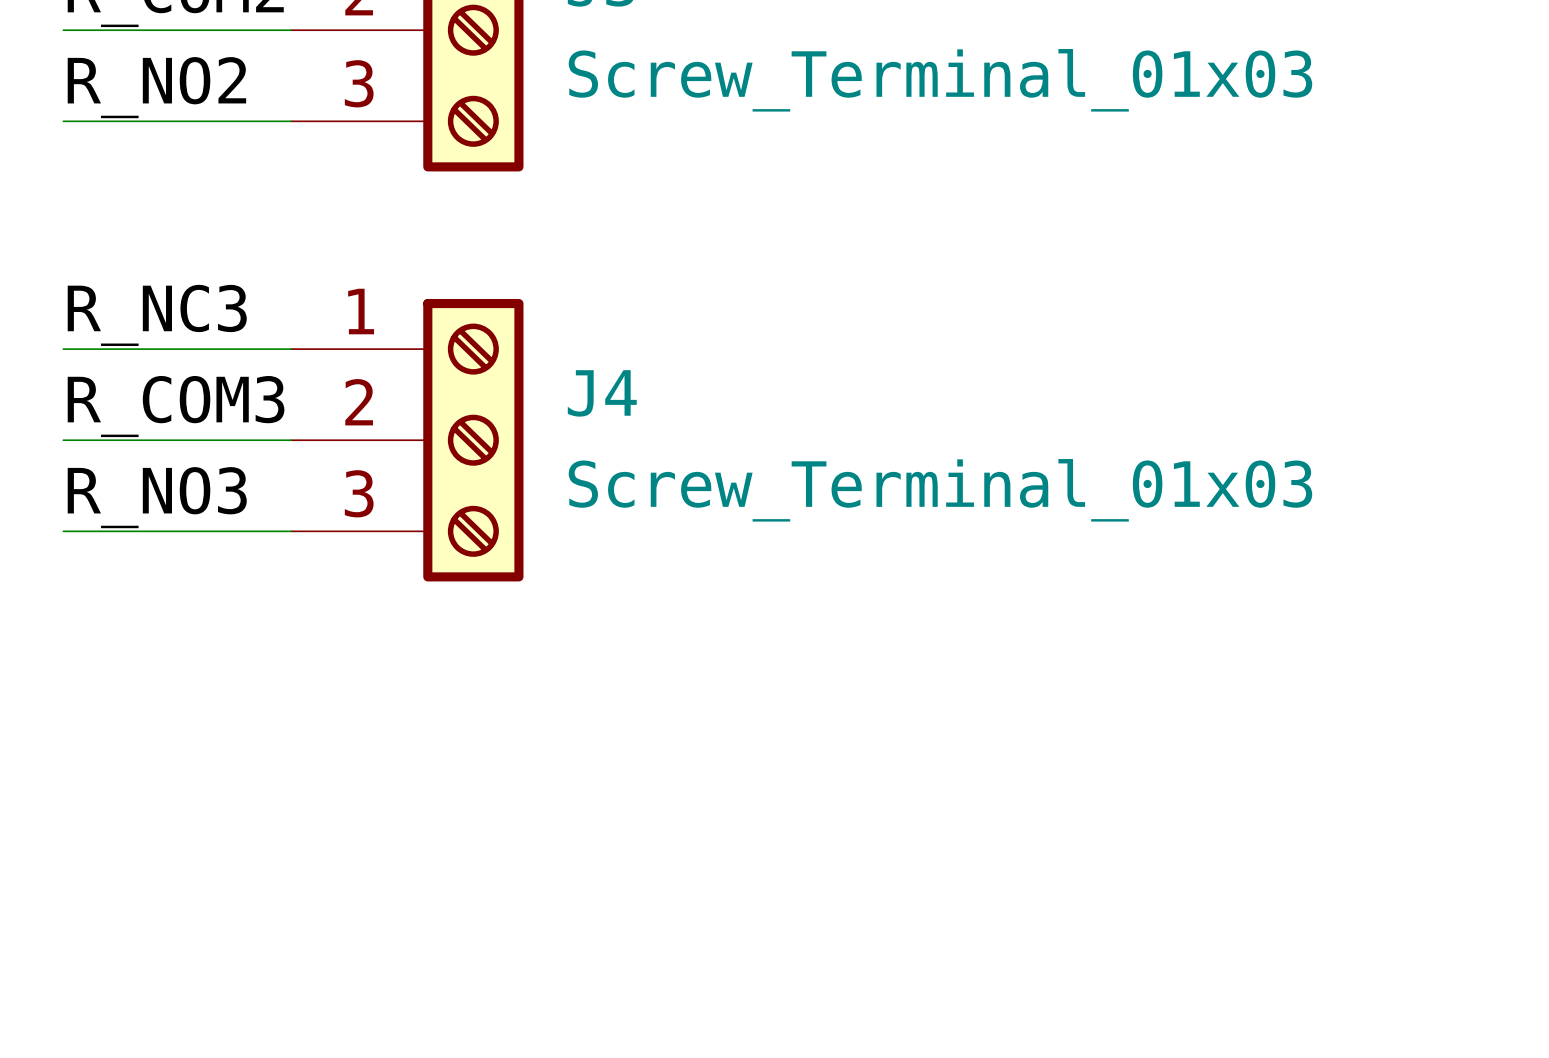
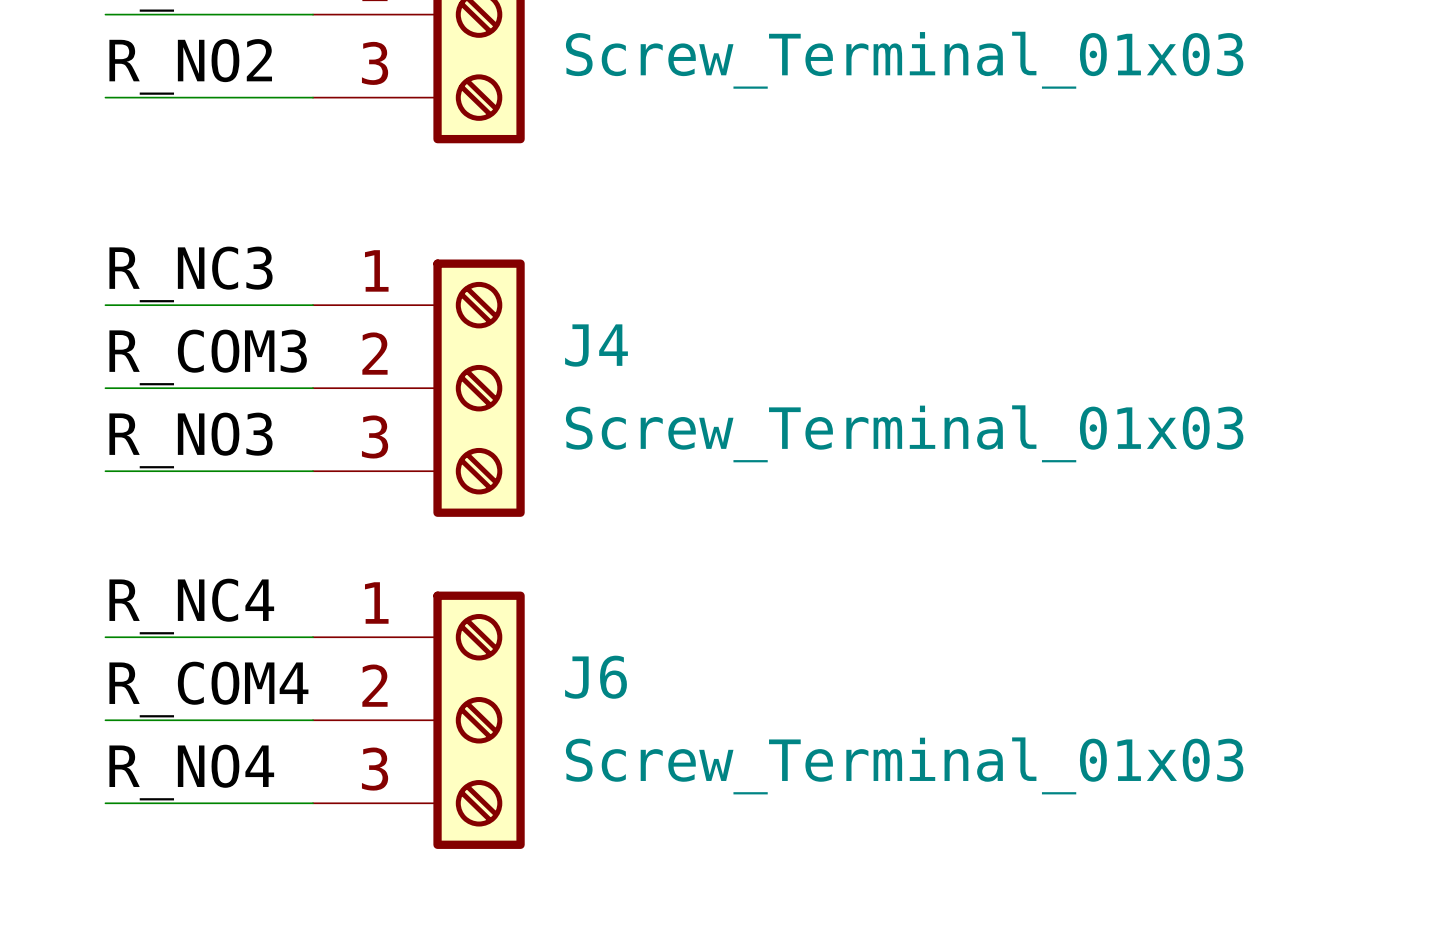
label: none -> R_NC4 (191, 606)
wire: none -> (105, 637) (313, 637)
label: none -> R_COM4 (208, 689)
wire: none -> (105, 720) (313, 720)
J6: none -> Screw_Terminal_01x03 (418, 720)
label: none -> R_NO4 (191, 772)
wire: none -> (105, 803) (313, 803)

